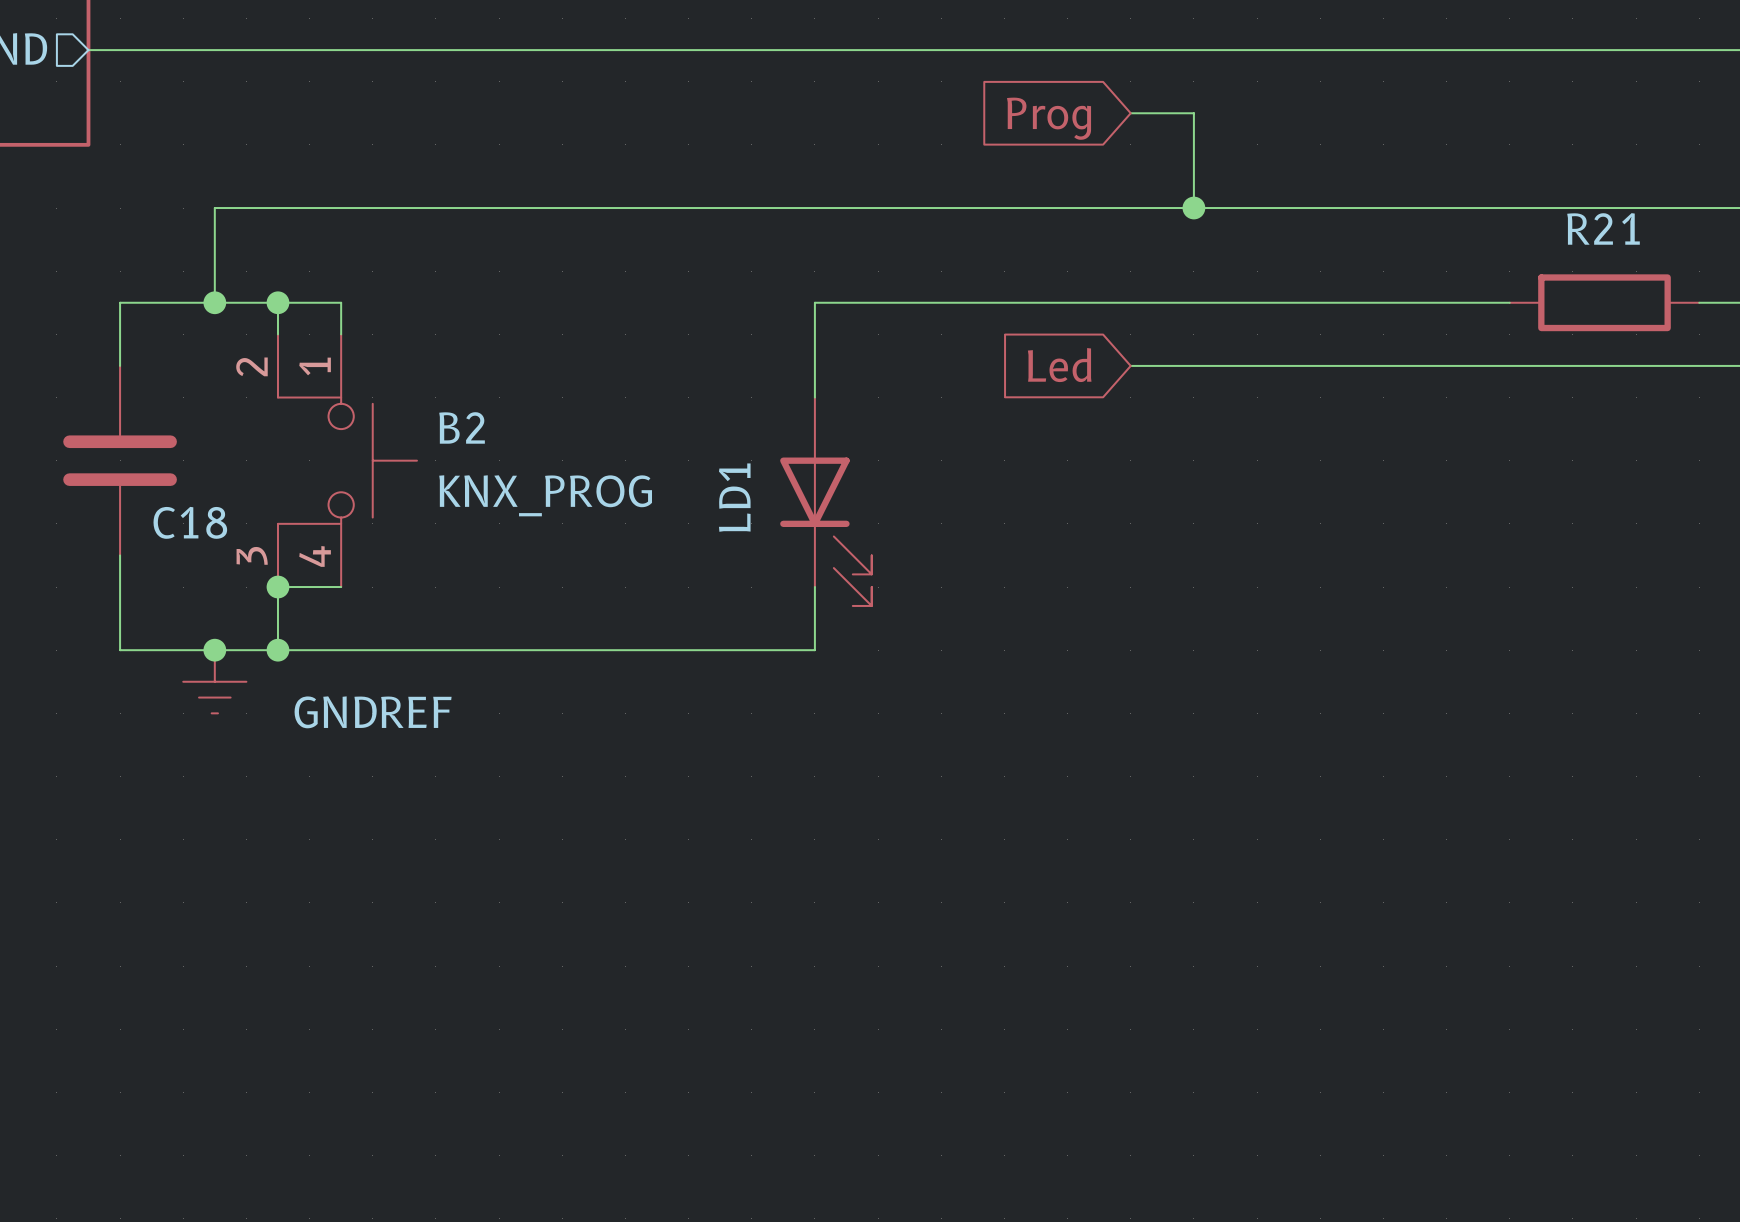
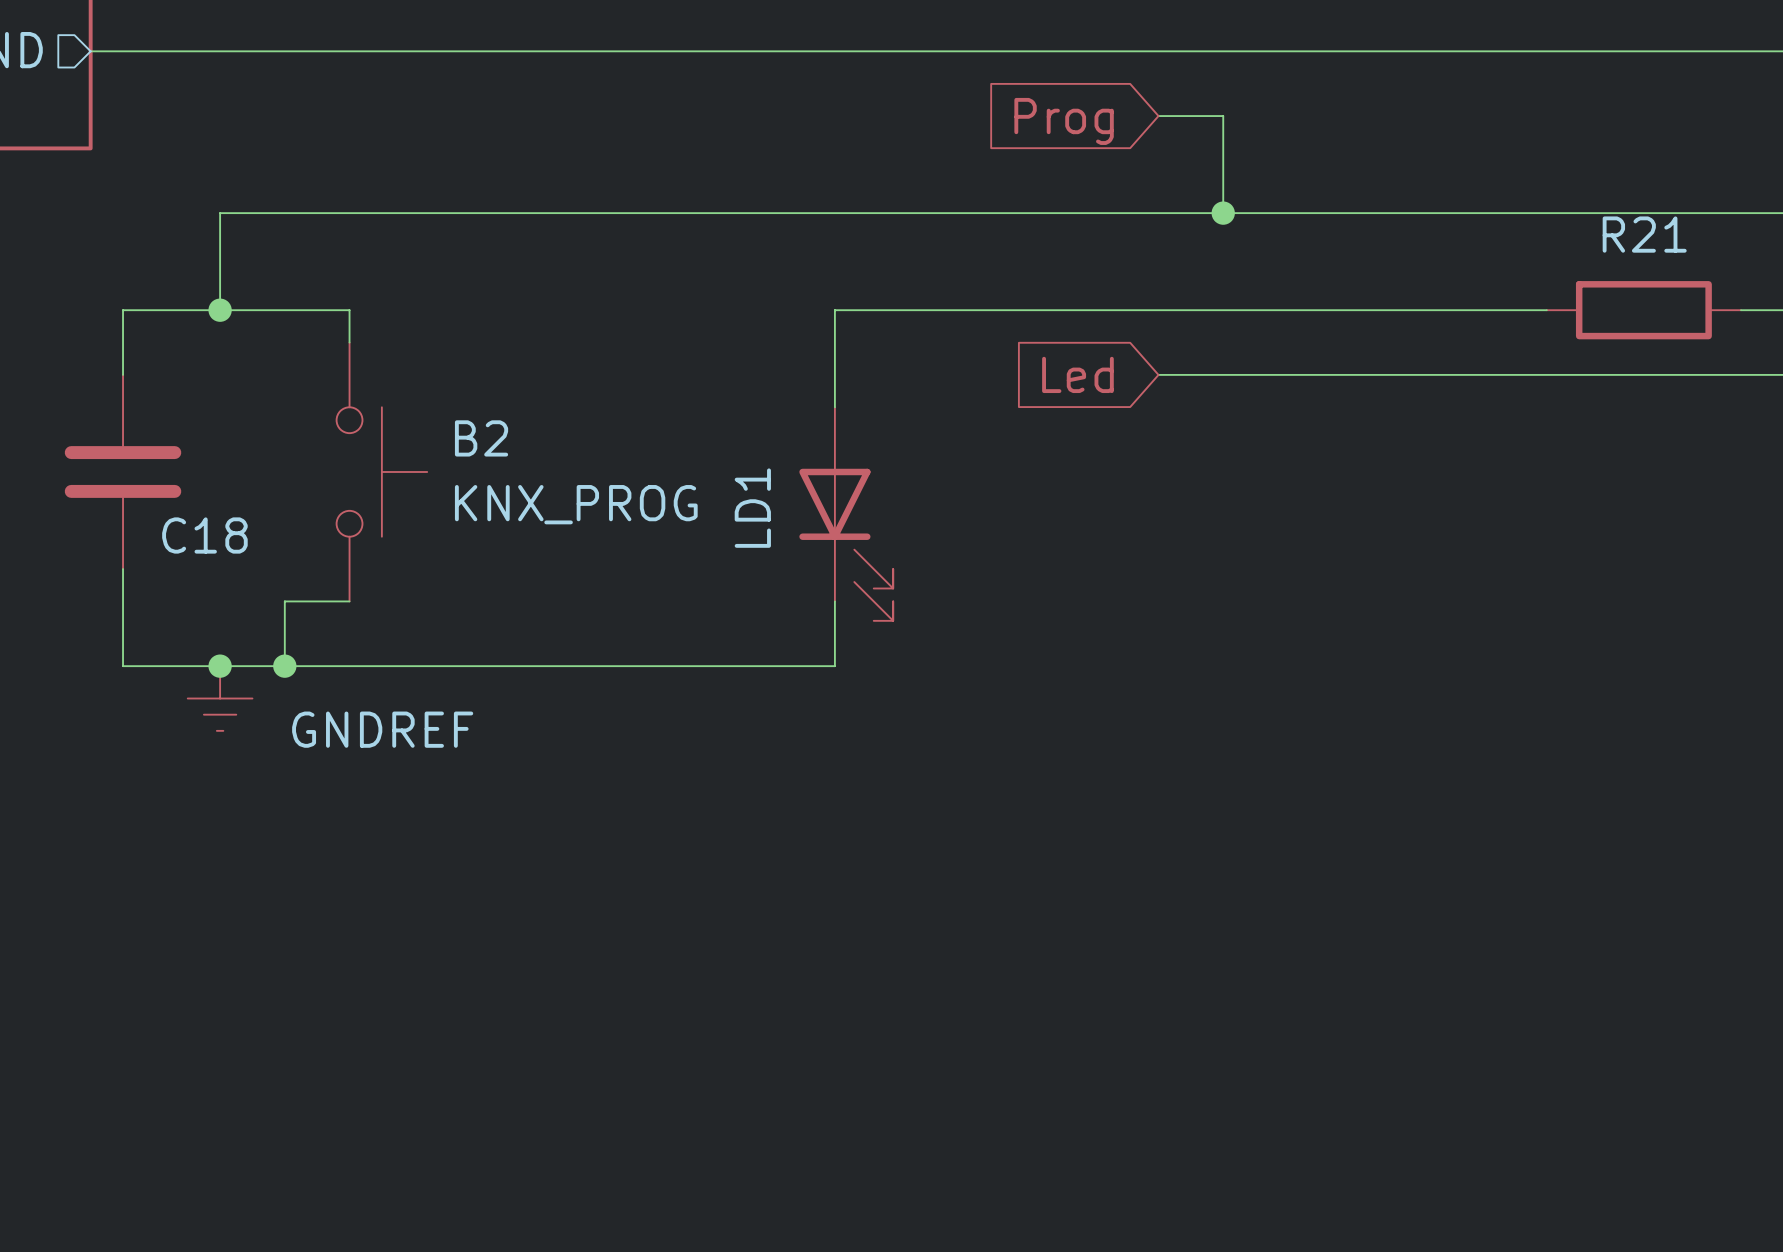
wire: (277, 302) (277, 334) -> none
junction: (277, 302) -> none
B2 symbol: [277, 334, 417, 588] -> [336, 342, 428, 602]
junction: (277, 587) -> none

